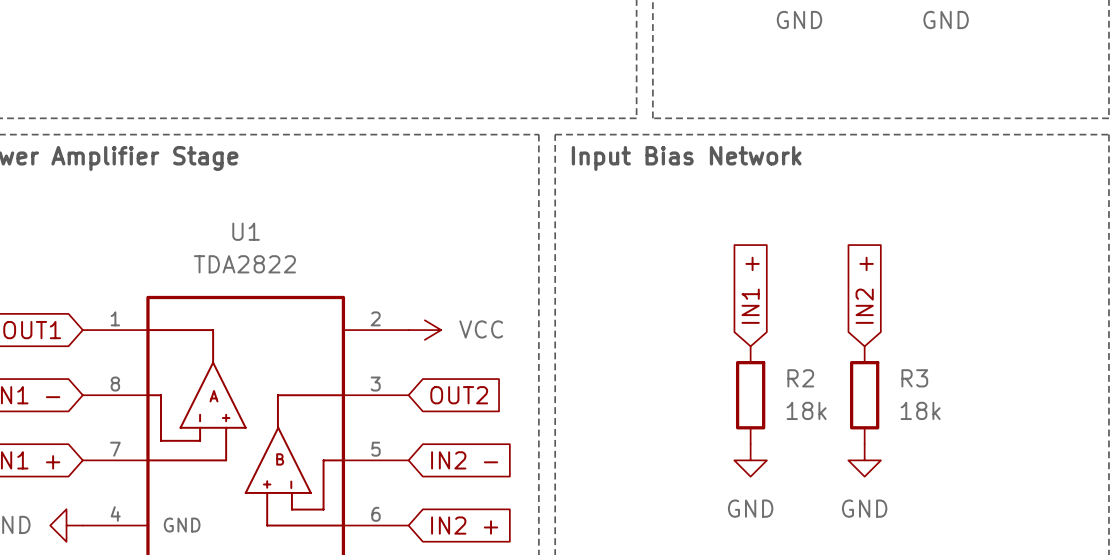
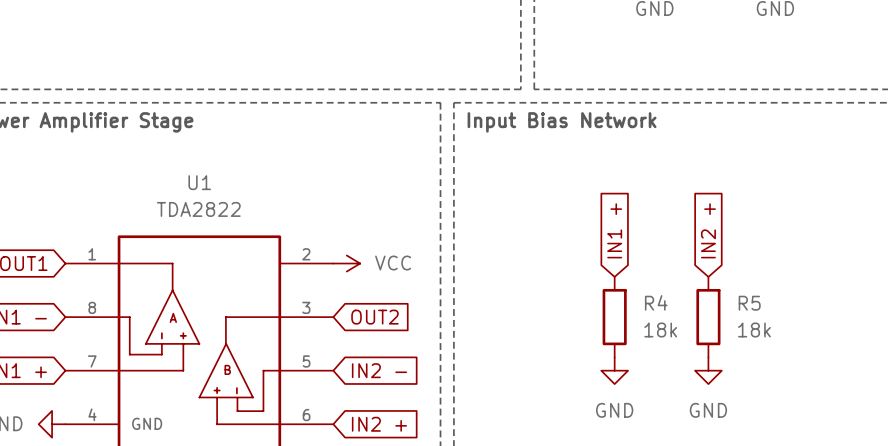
R2 name: R2 (800, 378) -> R4 (656, 302)
R3 name: R3 (914, 378) -> R5 (749, 303)

